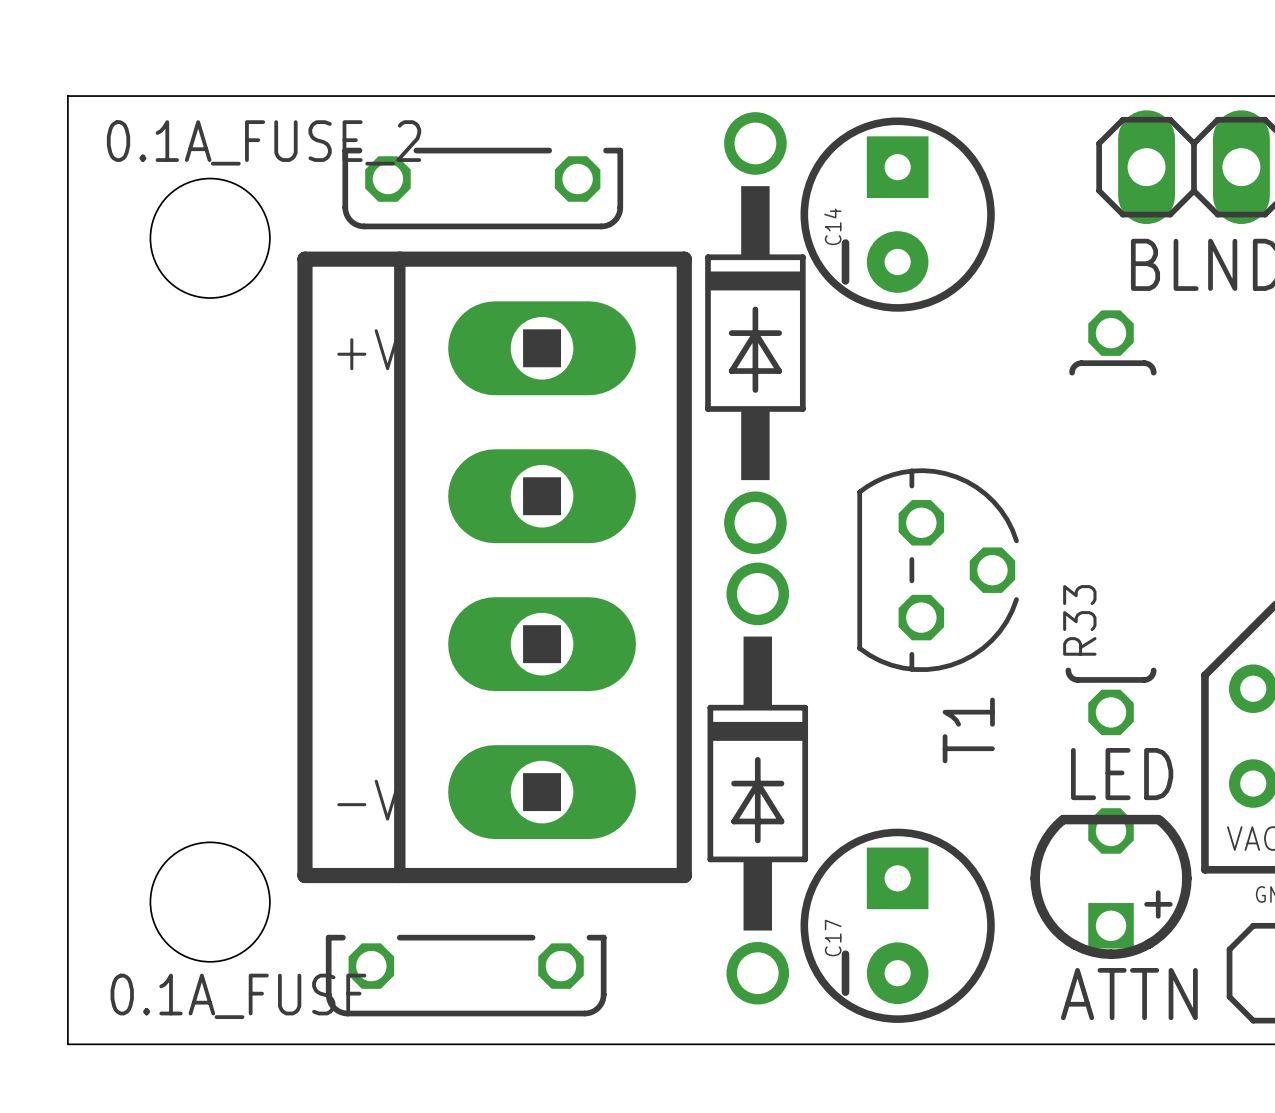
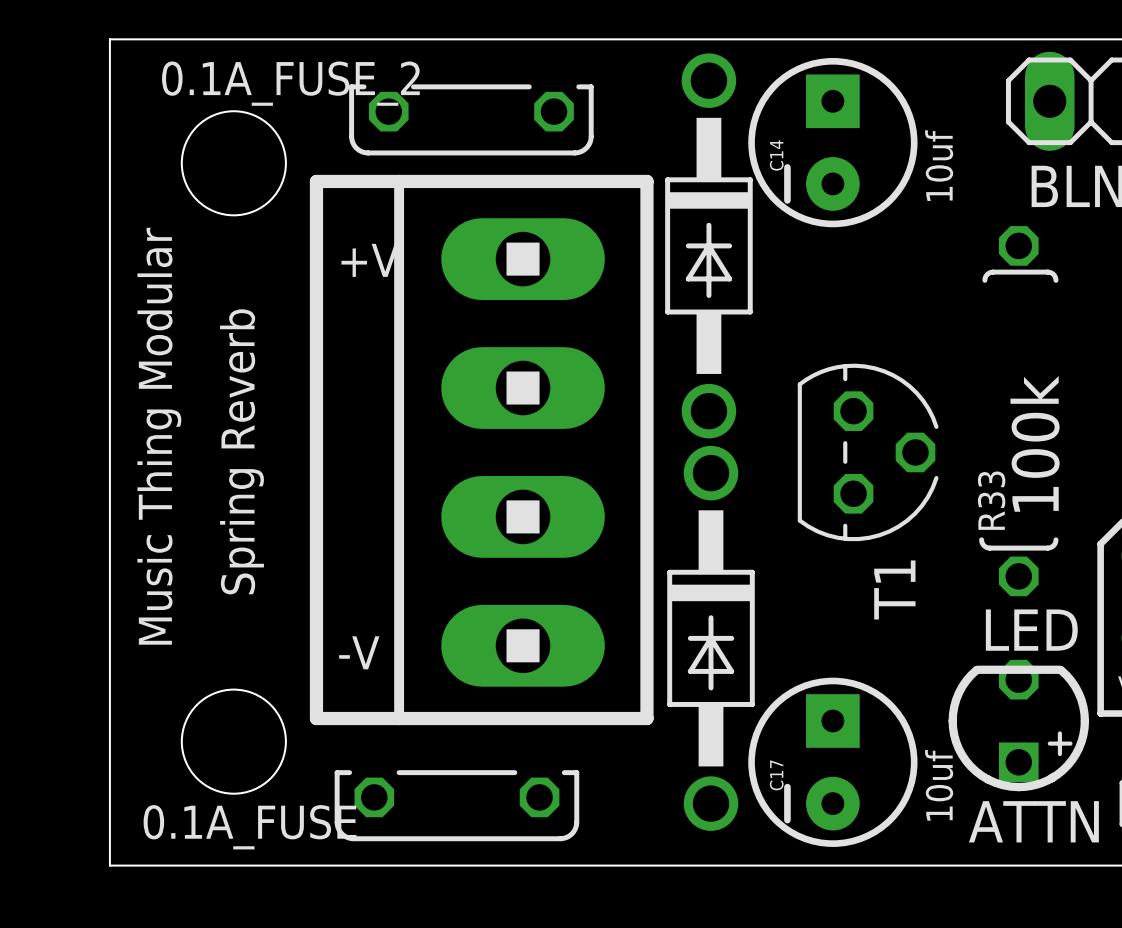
C14 value: none -> 10uf (939, 165)
text: none -> Music Thing Modular (159, 436)
text: none -> Spring Reverb (242, 451)
R33 value: none -> 100k (1035, 443)
C17 value: none -> 10uf (939, 785)

